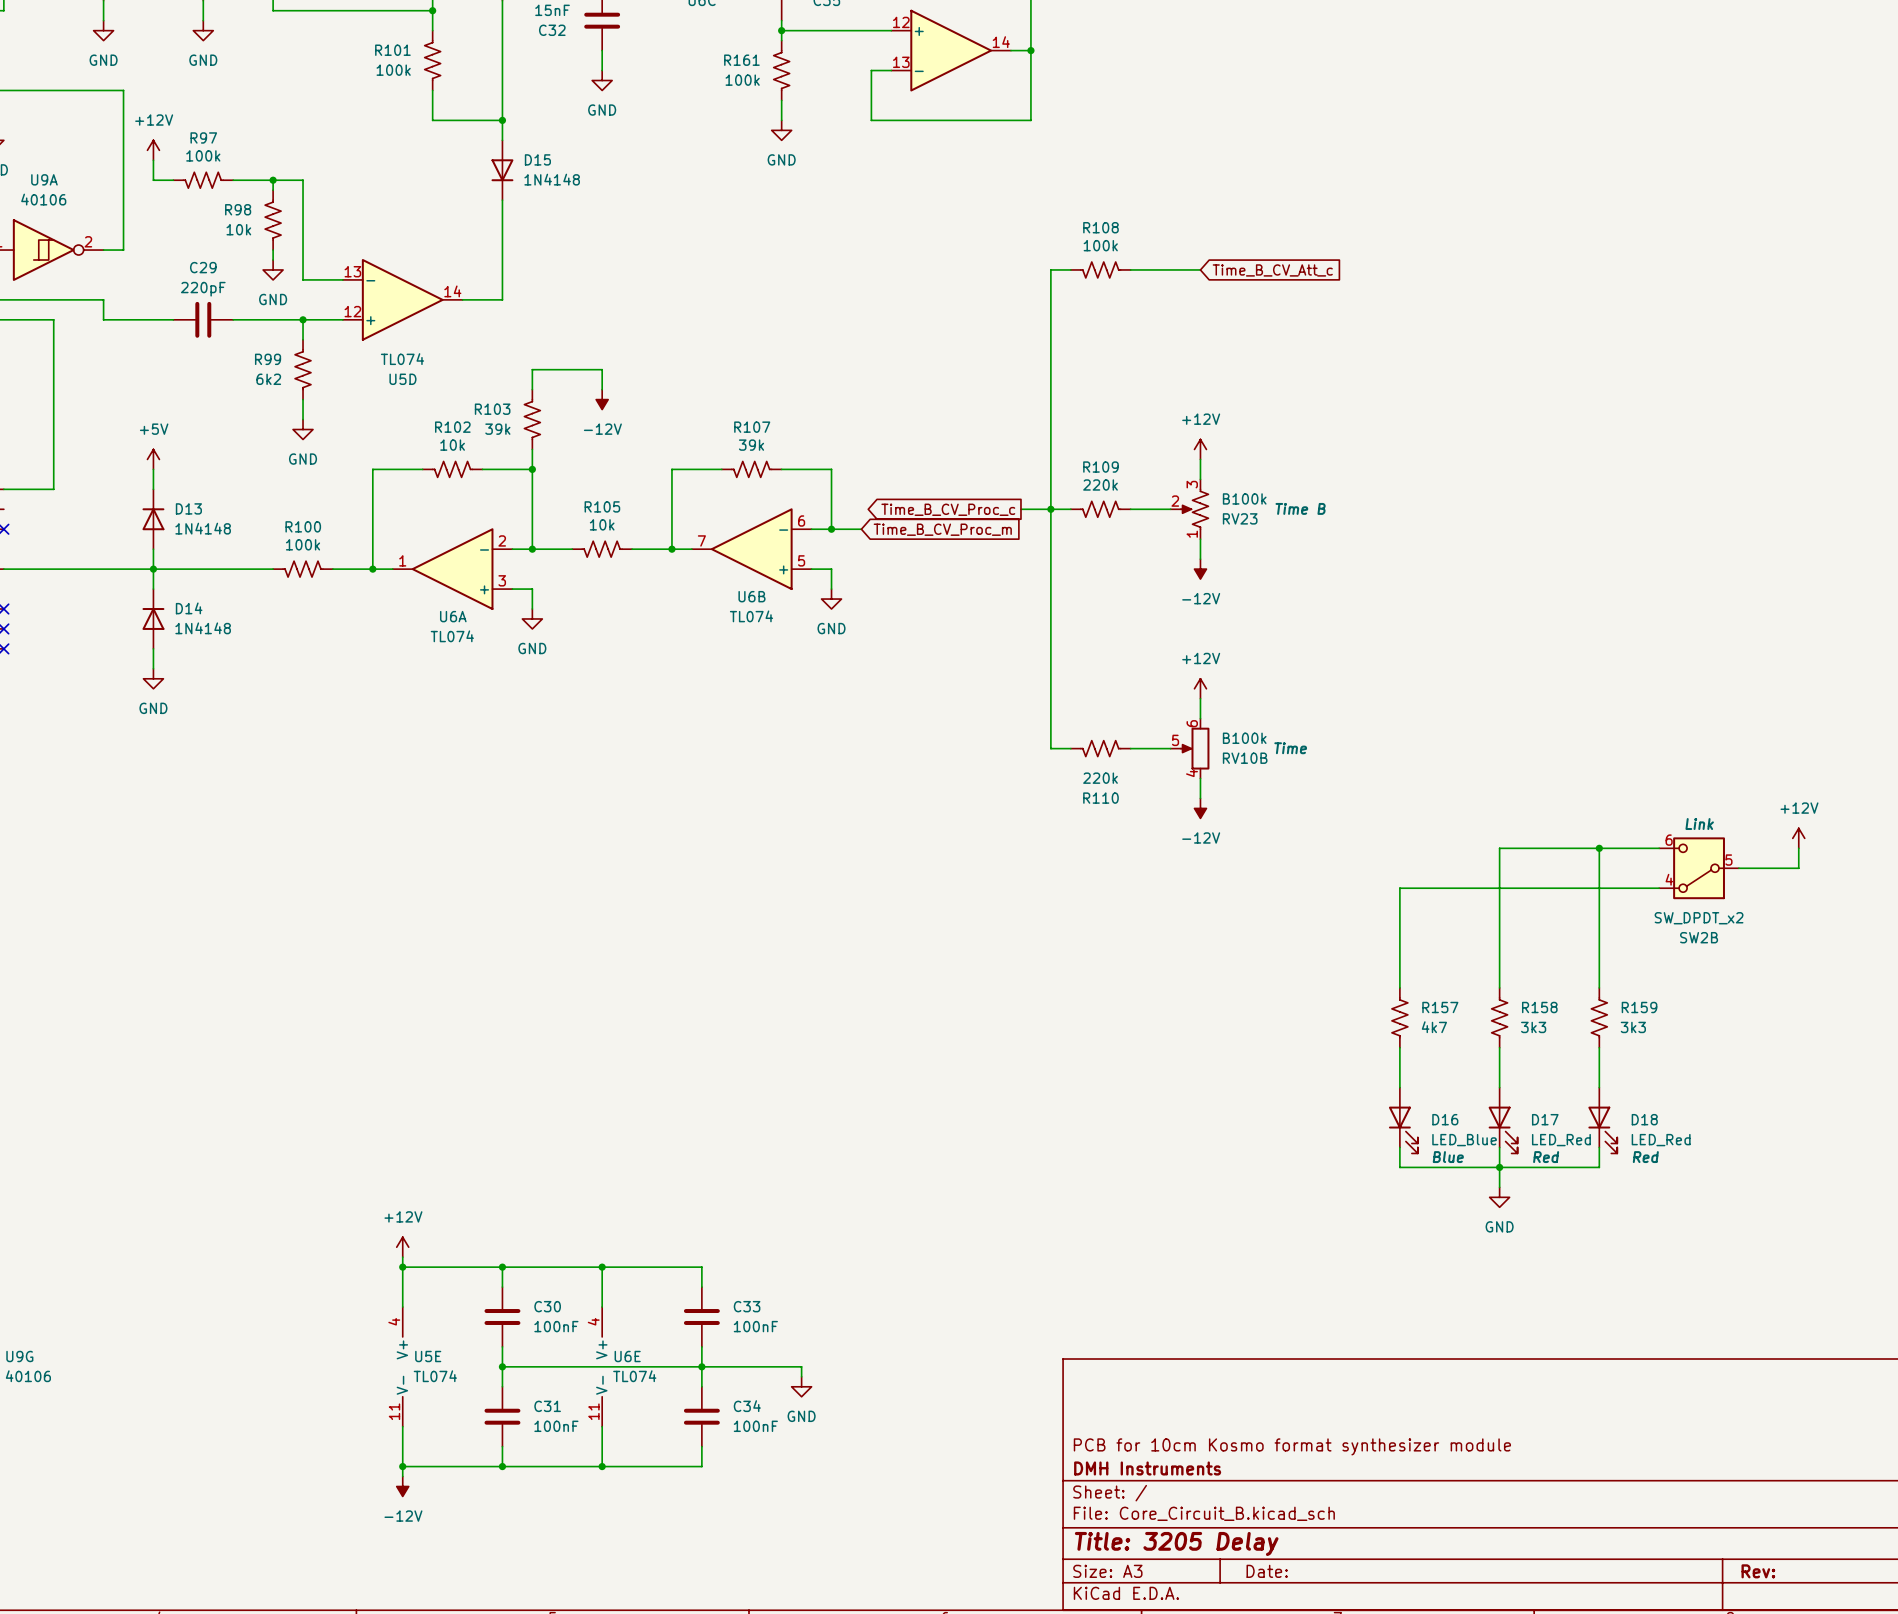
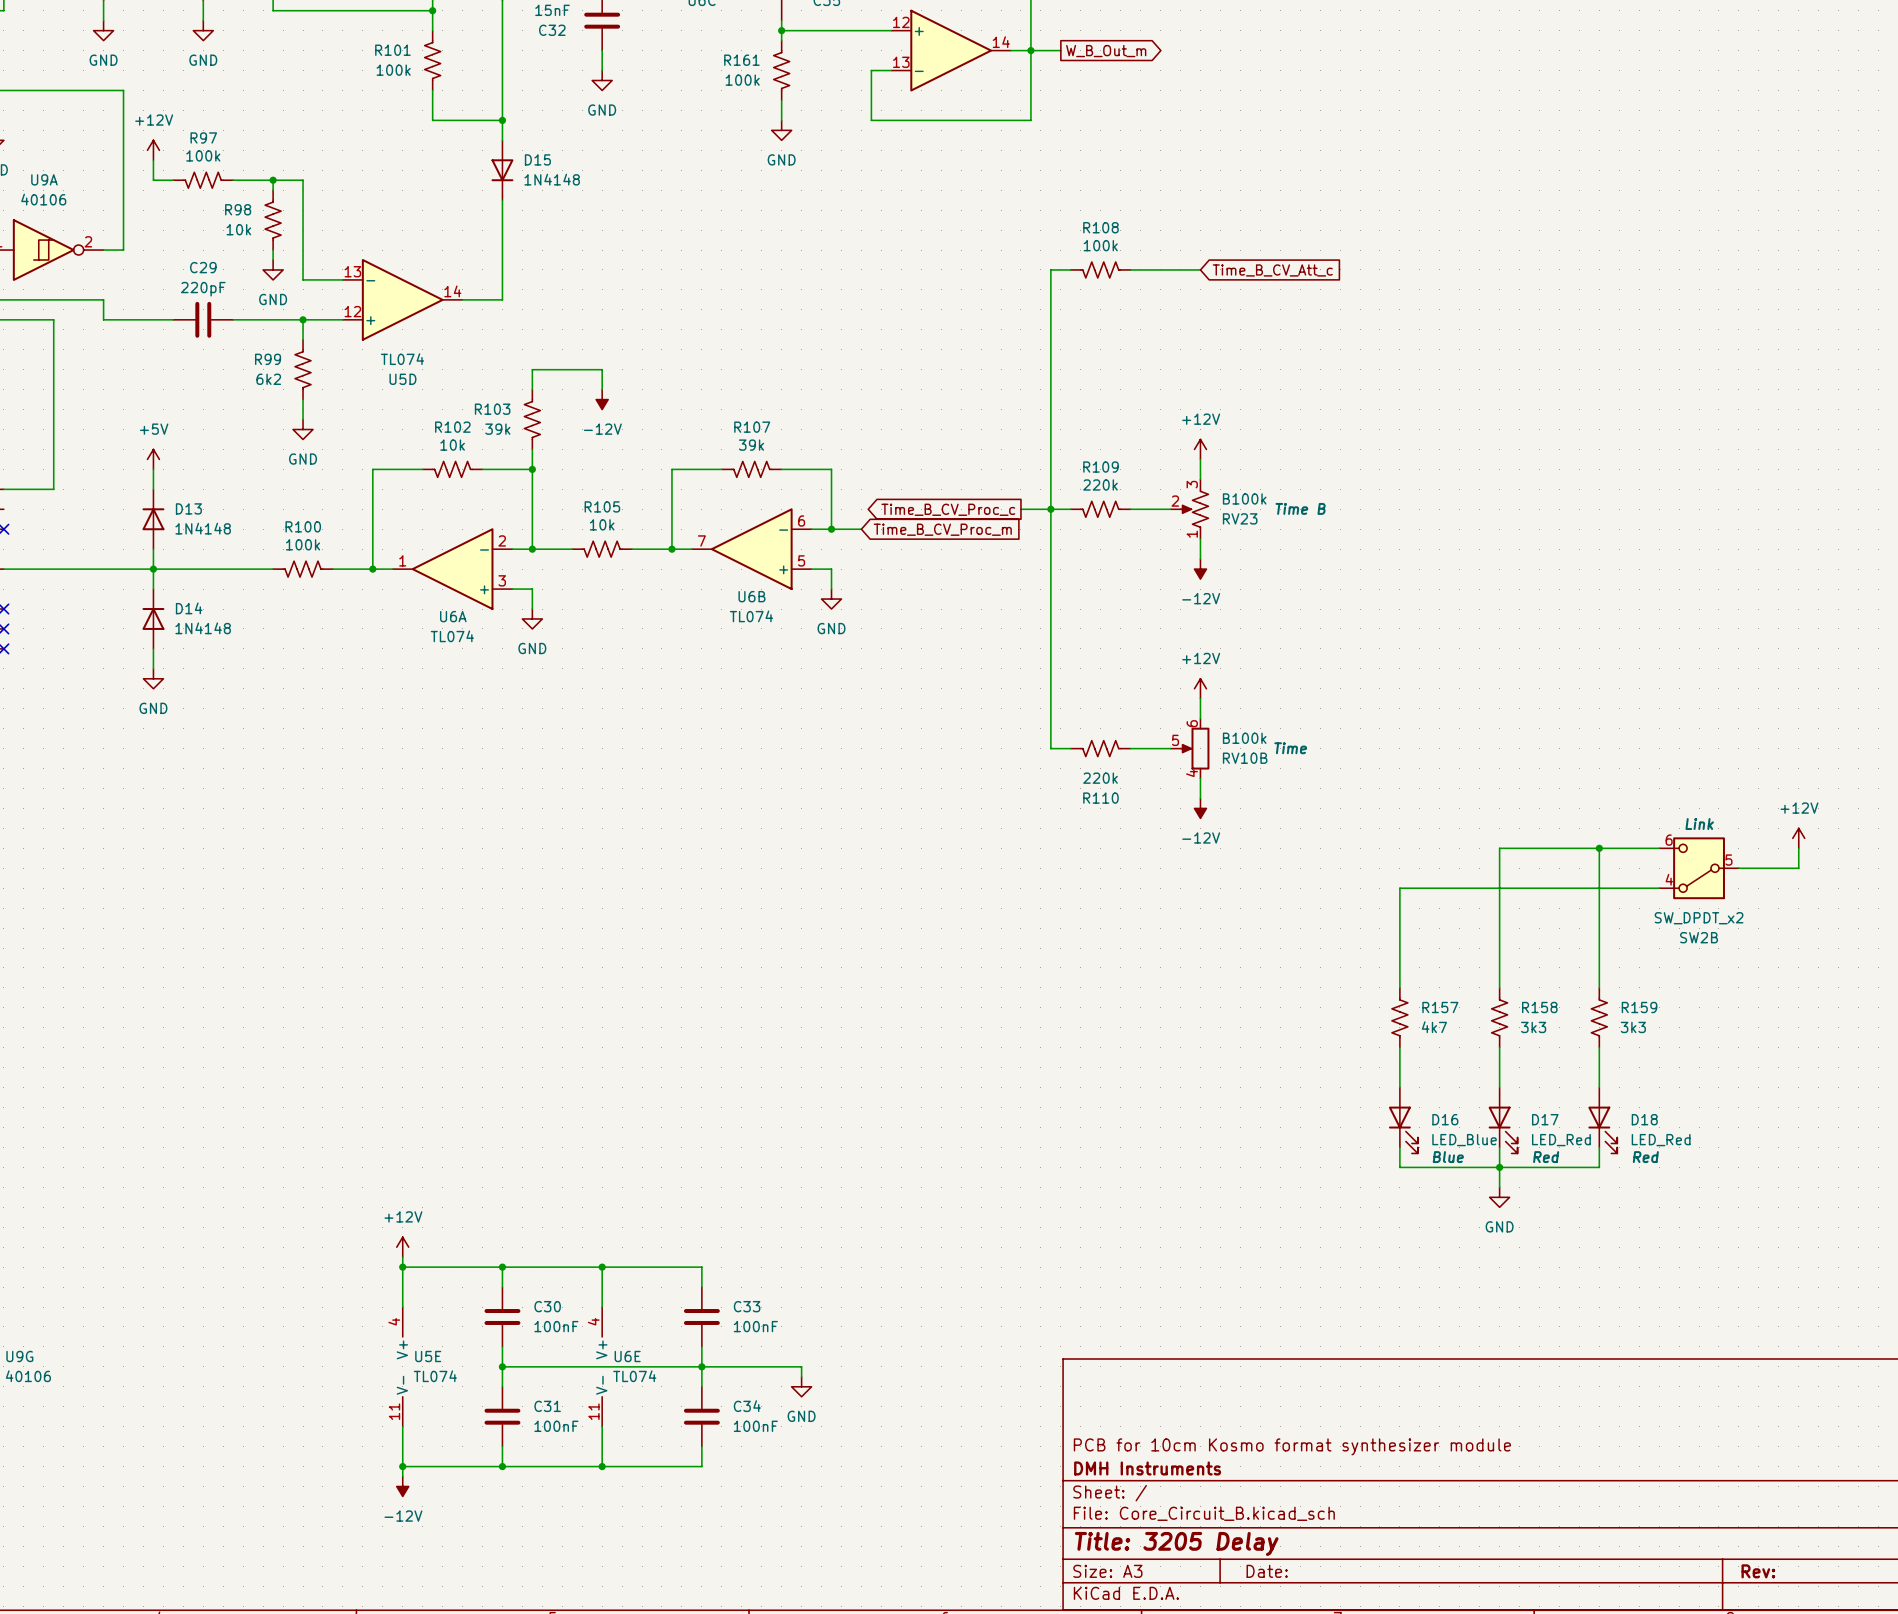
wire: none -> (1030, 50) (1060, 50)
global label: none -> W_B_Out_m (1106, 51)

